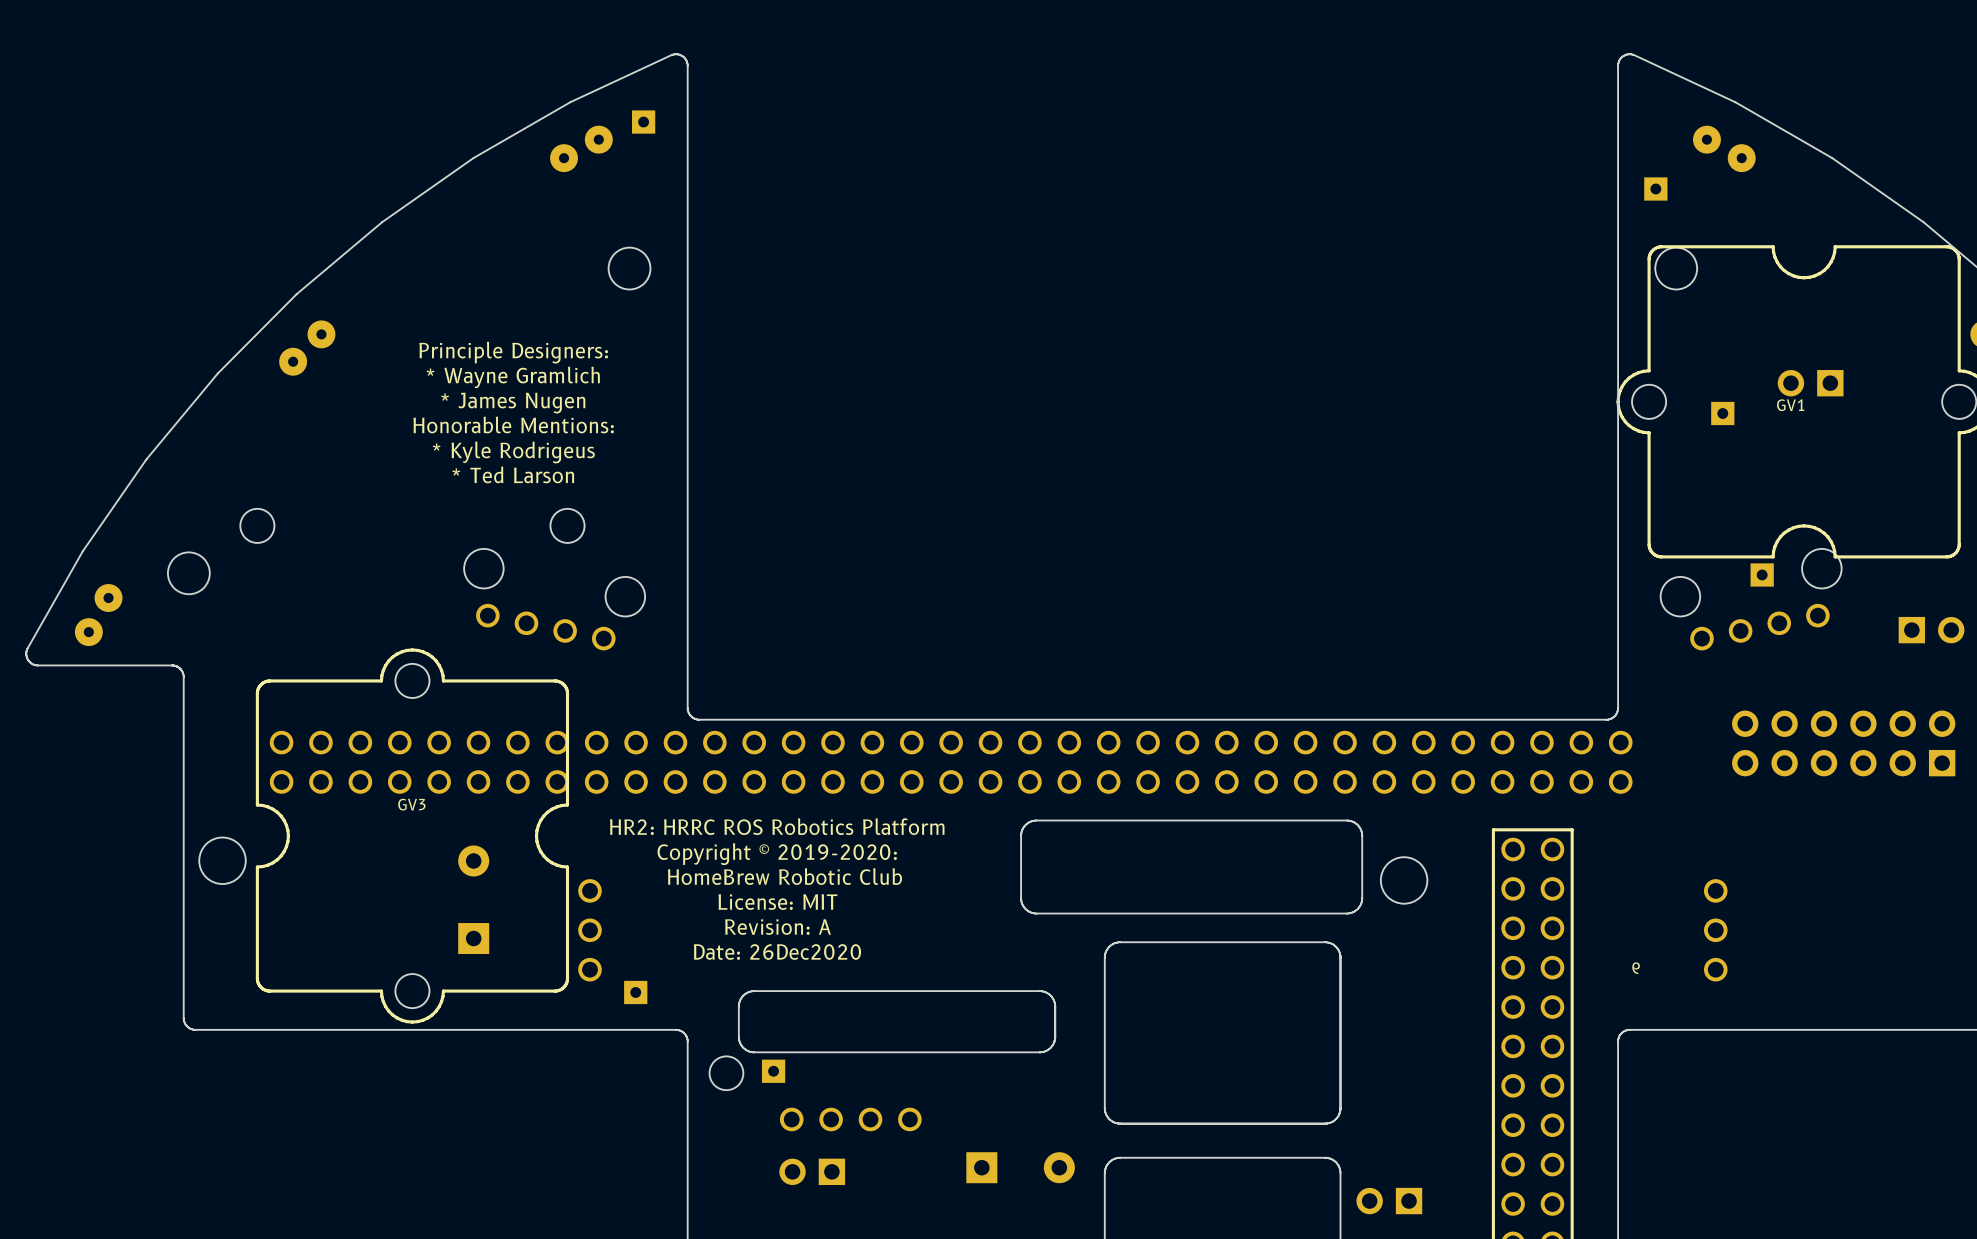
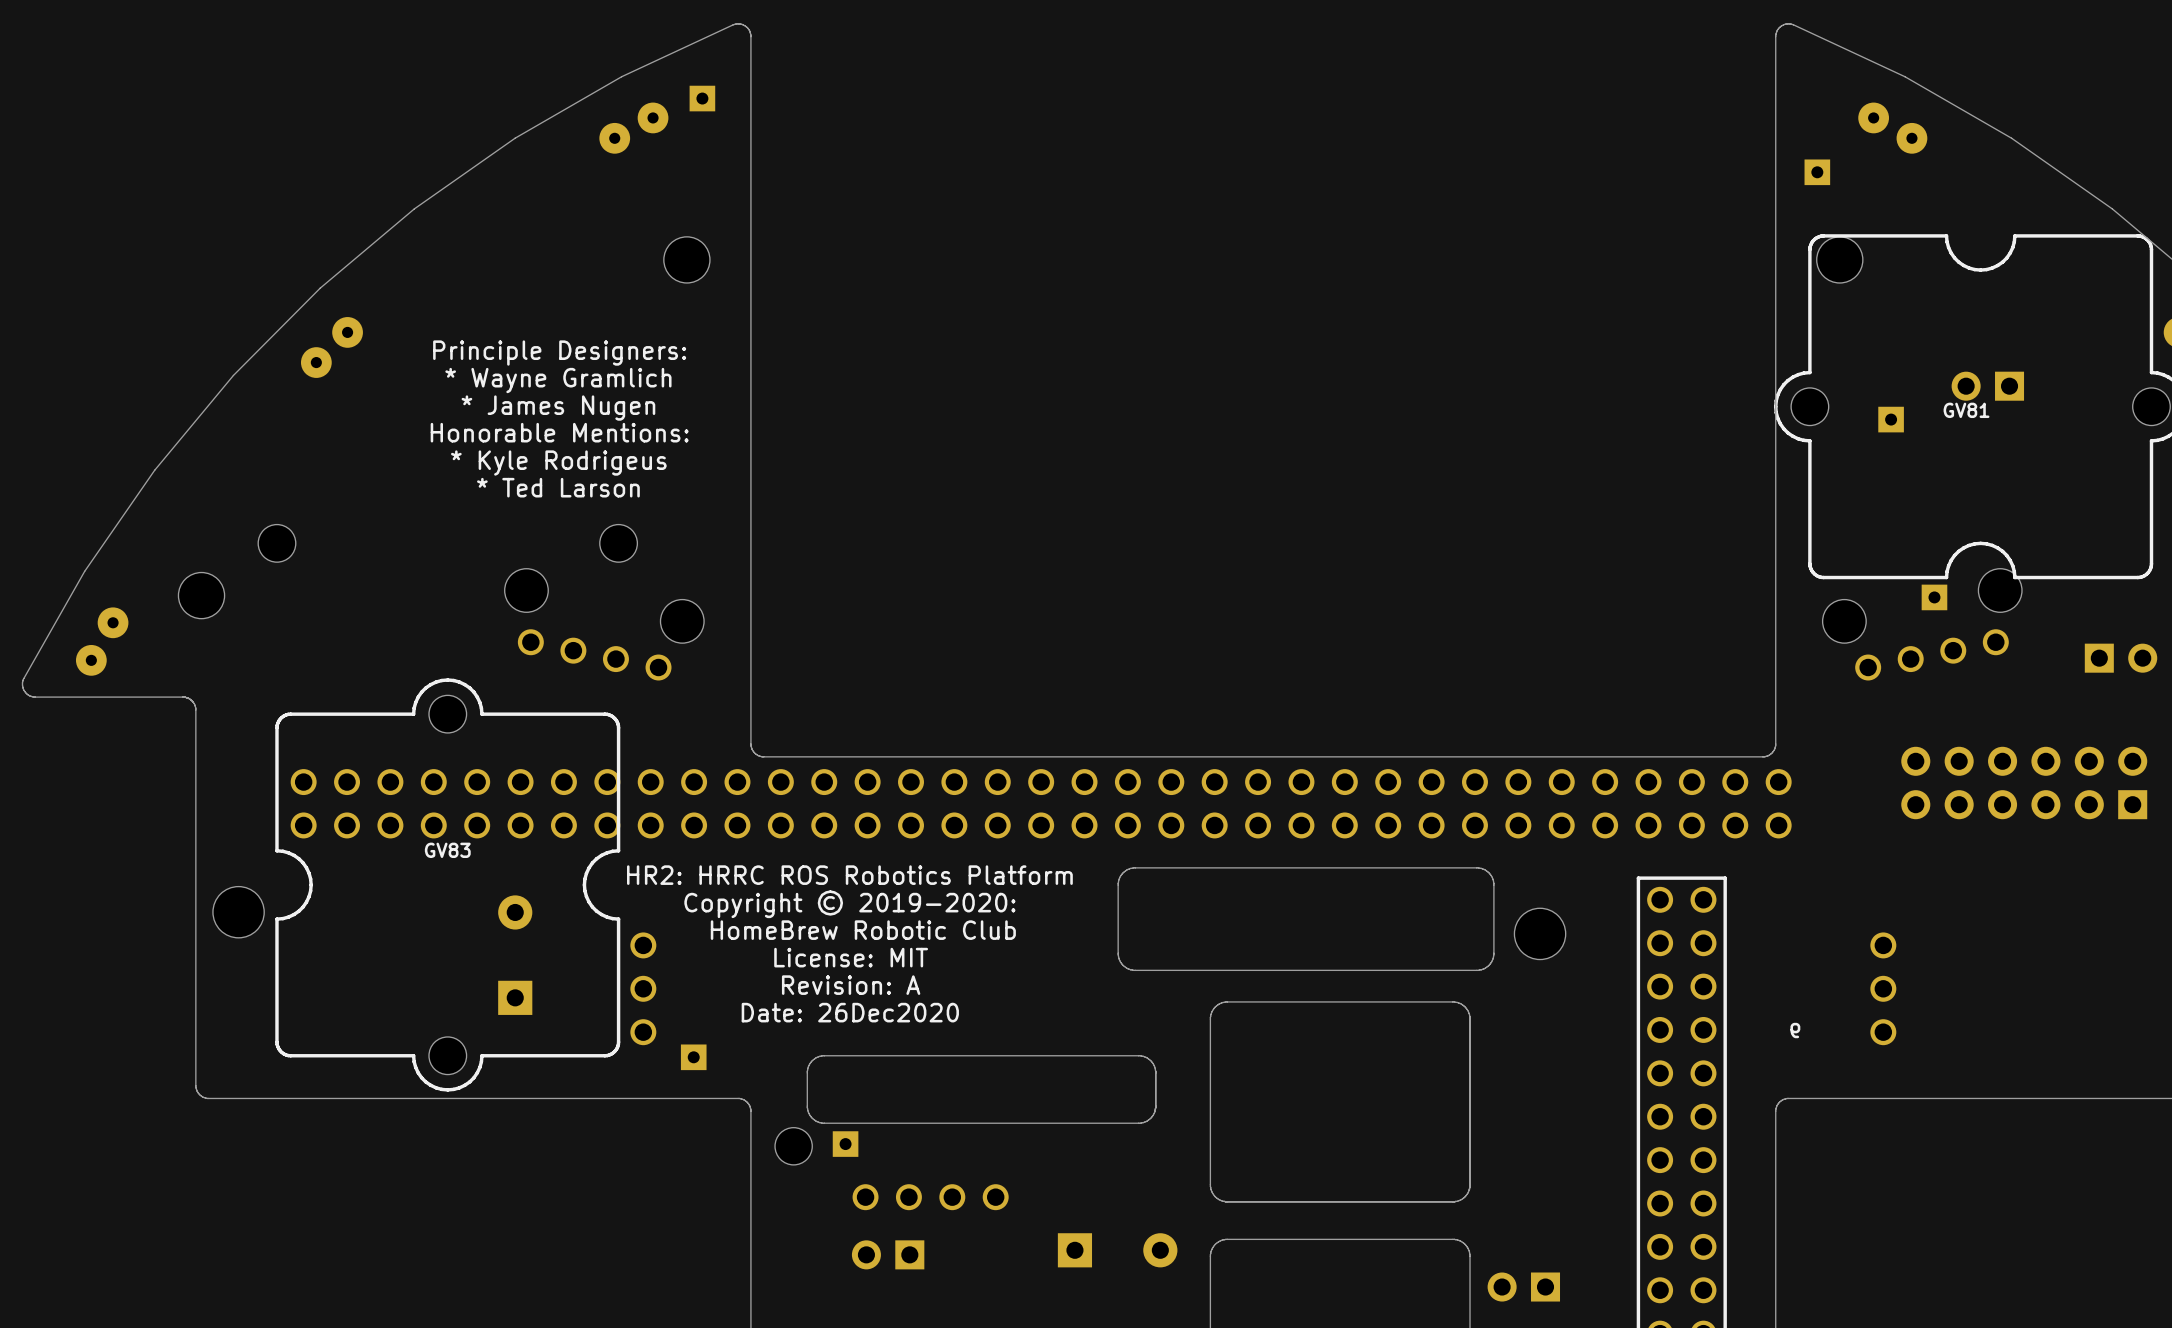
GV1 name: GV1 (1790, 405) -> GV81 (1966, 410)
GV3 name: GV3 (411, 804) -> GV83 (447, 850)

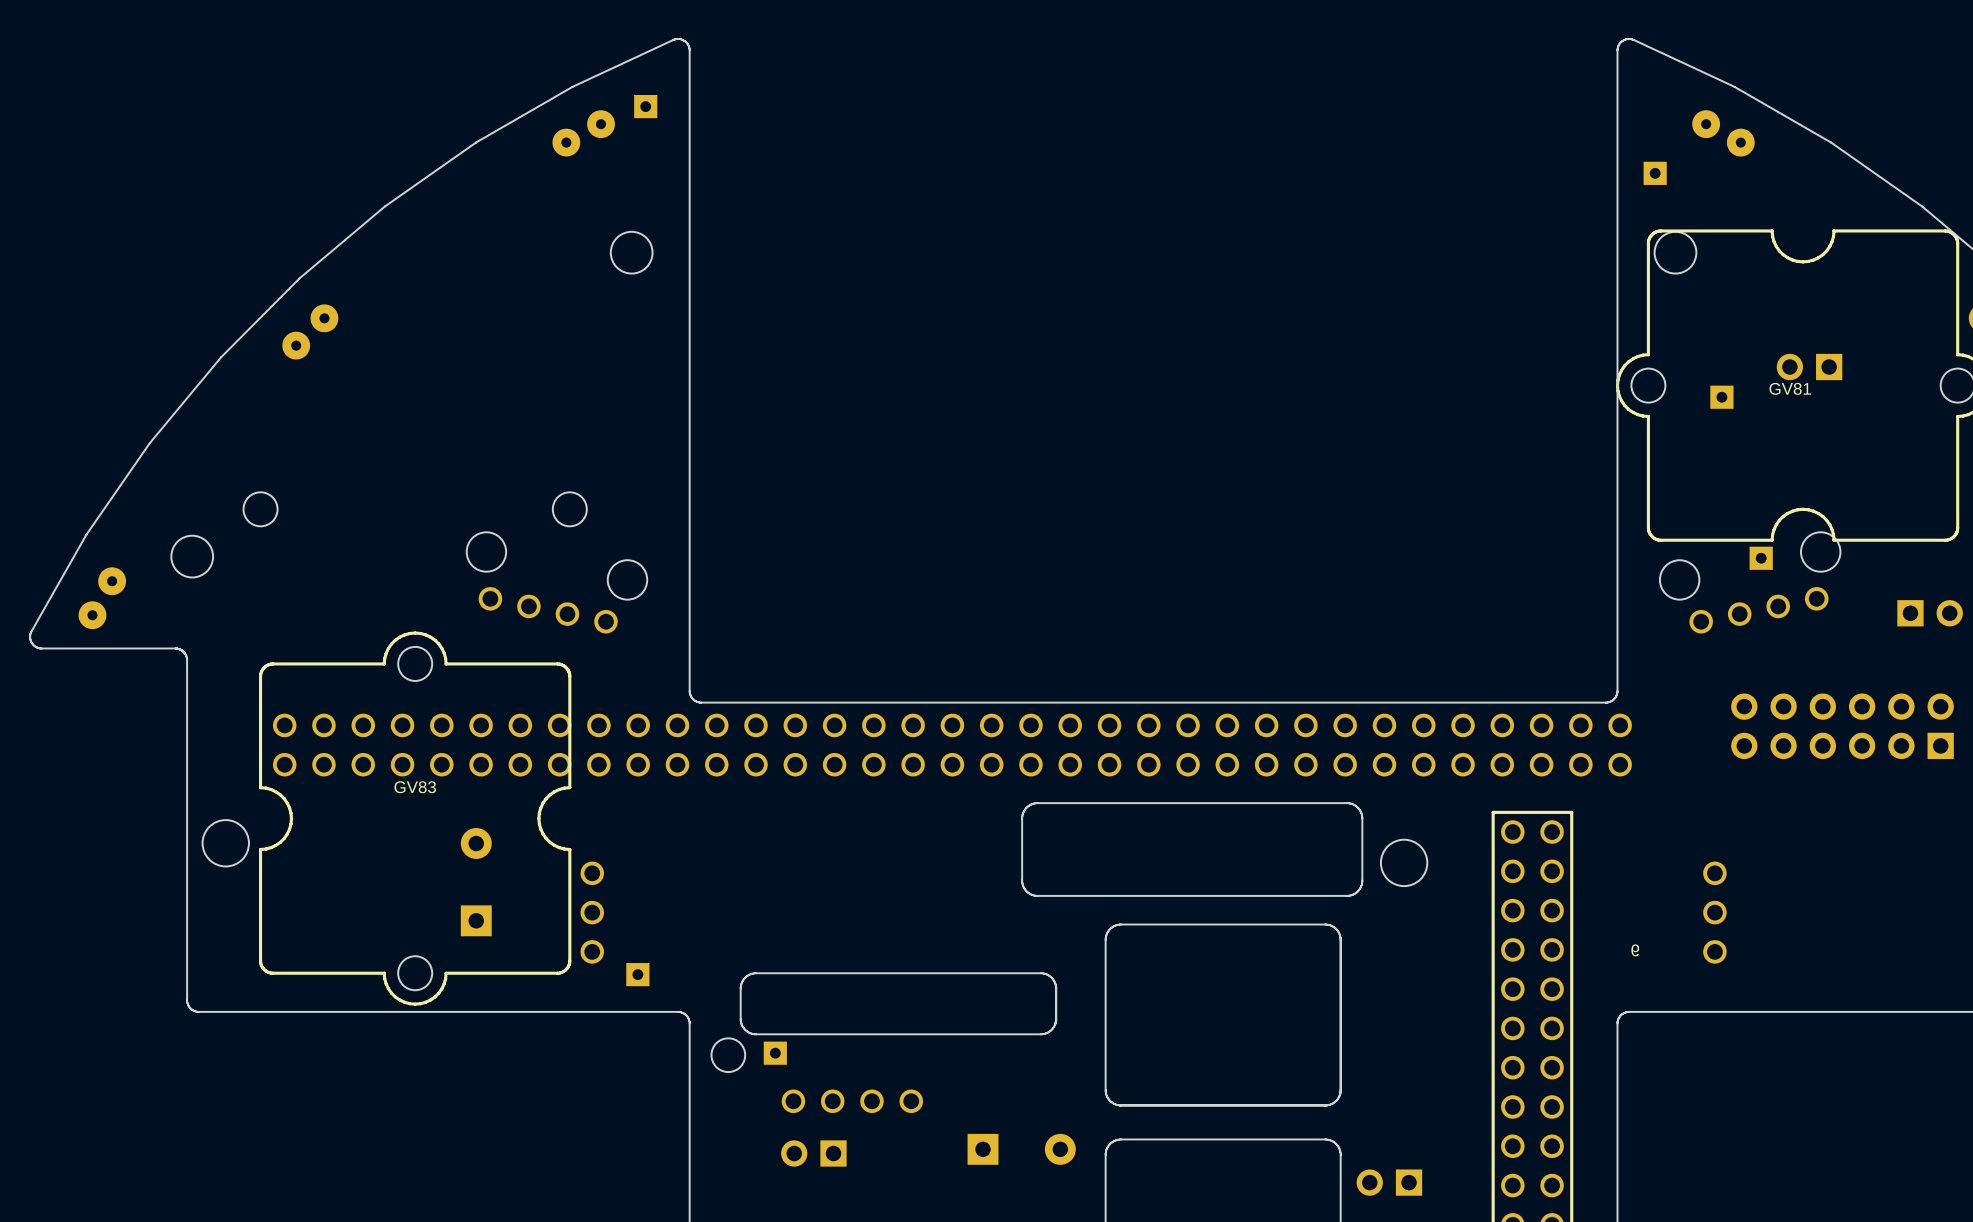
text: Principle Designers: (559, 353) -> none
text: * Wayne Gramlich (558, 380) -> none
text: * James Nugen (558, 408) -> none
text: Honorable Mentions: (559, 432) -> none
text: * Kyle Rodrigeus (558, 463) -> none
text: * Ted Larson (558, 487) -> none
text: HR2: HRRC ROS Robotics Platform (849, 875) -> none
text: Copyright © 2019-2020: (849, 904) -> none
text: HomeBrew Robotic Club (863, 930) -> none
text: License: MIT (851, 957) -> none
text: Revision: A (851, 985) -> none
text: Date: 26Dec2020 (850, 1012) -> none

